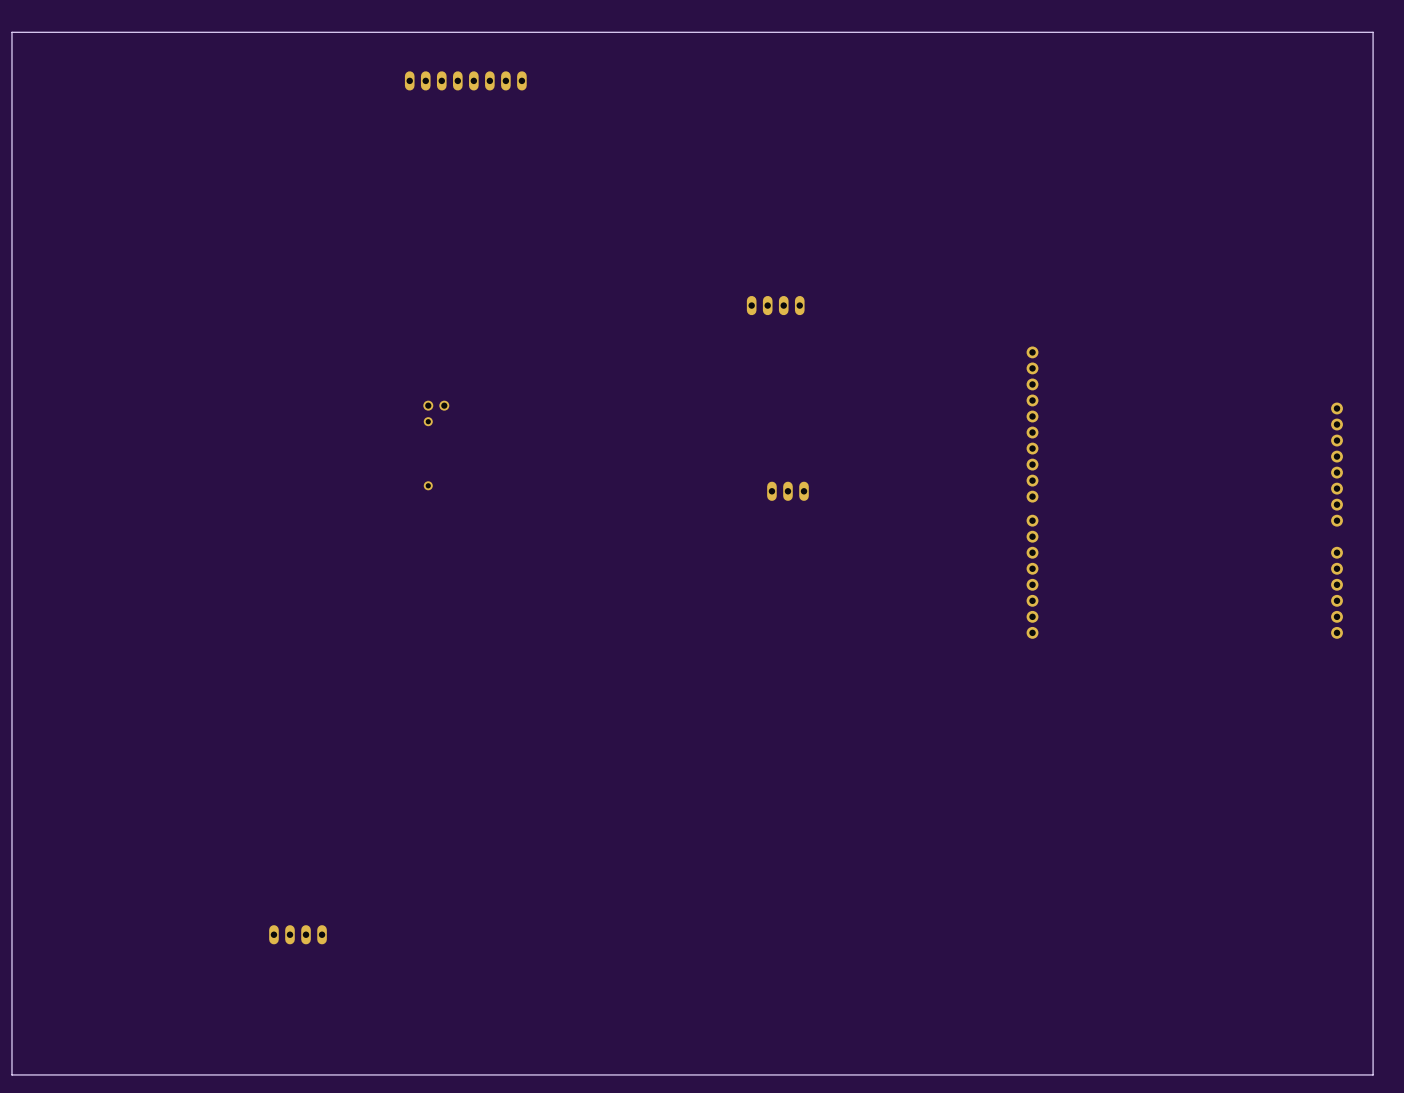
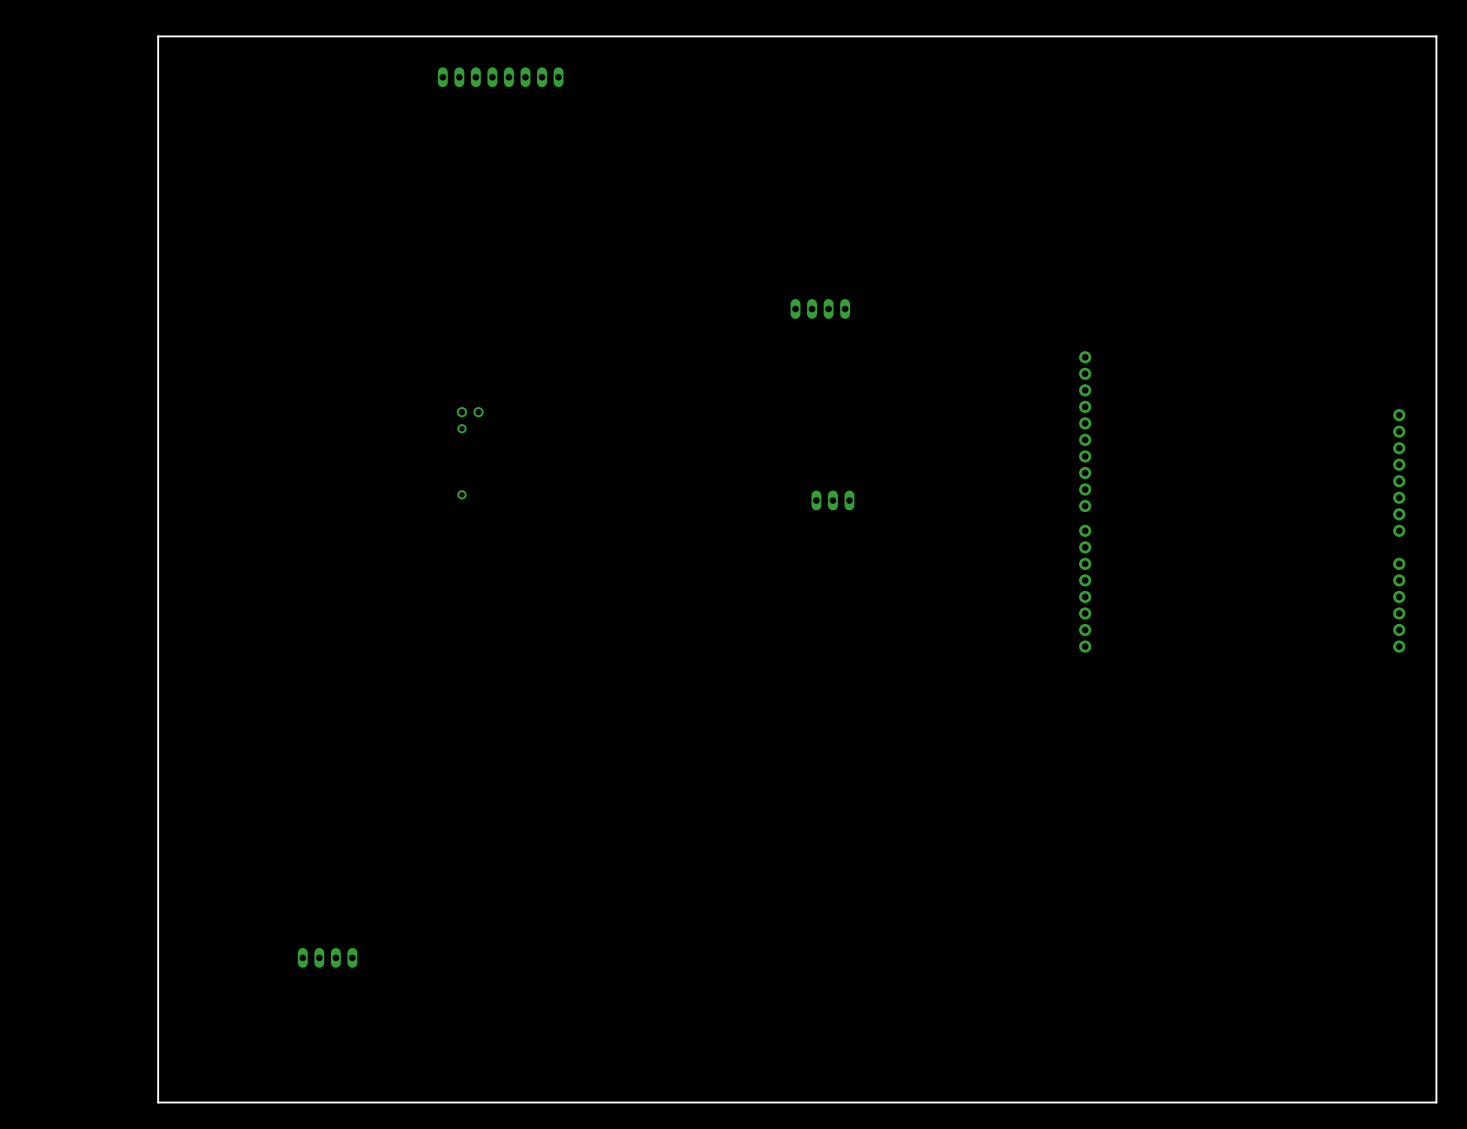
board edge: (1373, 41) (1373, 32) (11, 32) (11, 1074) (133, 1074) -> (1436, 36) (158, 36) (158, 1102)

